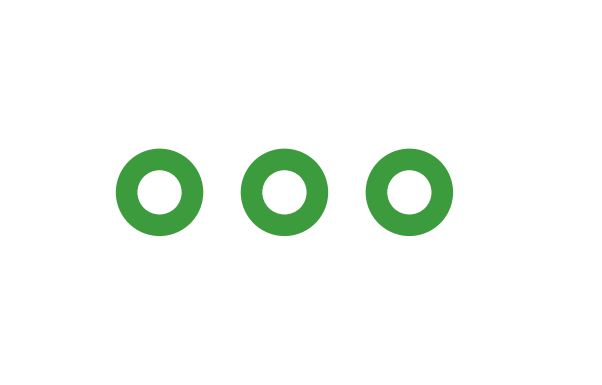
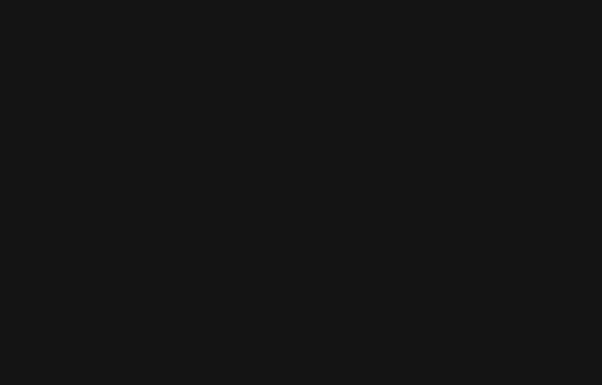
part: (284, 192) -> none

